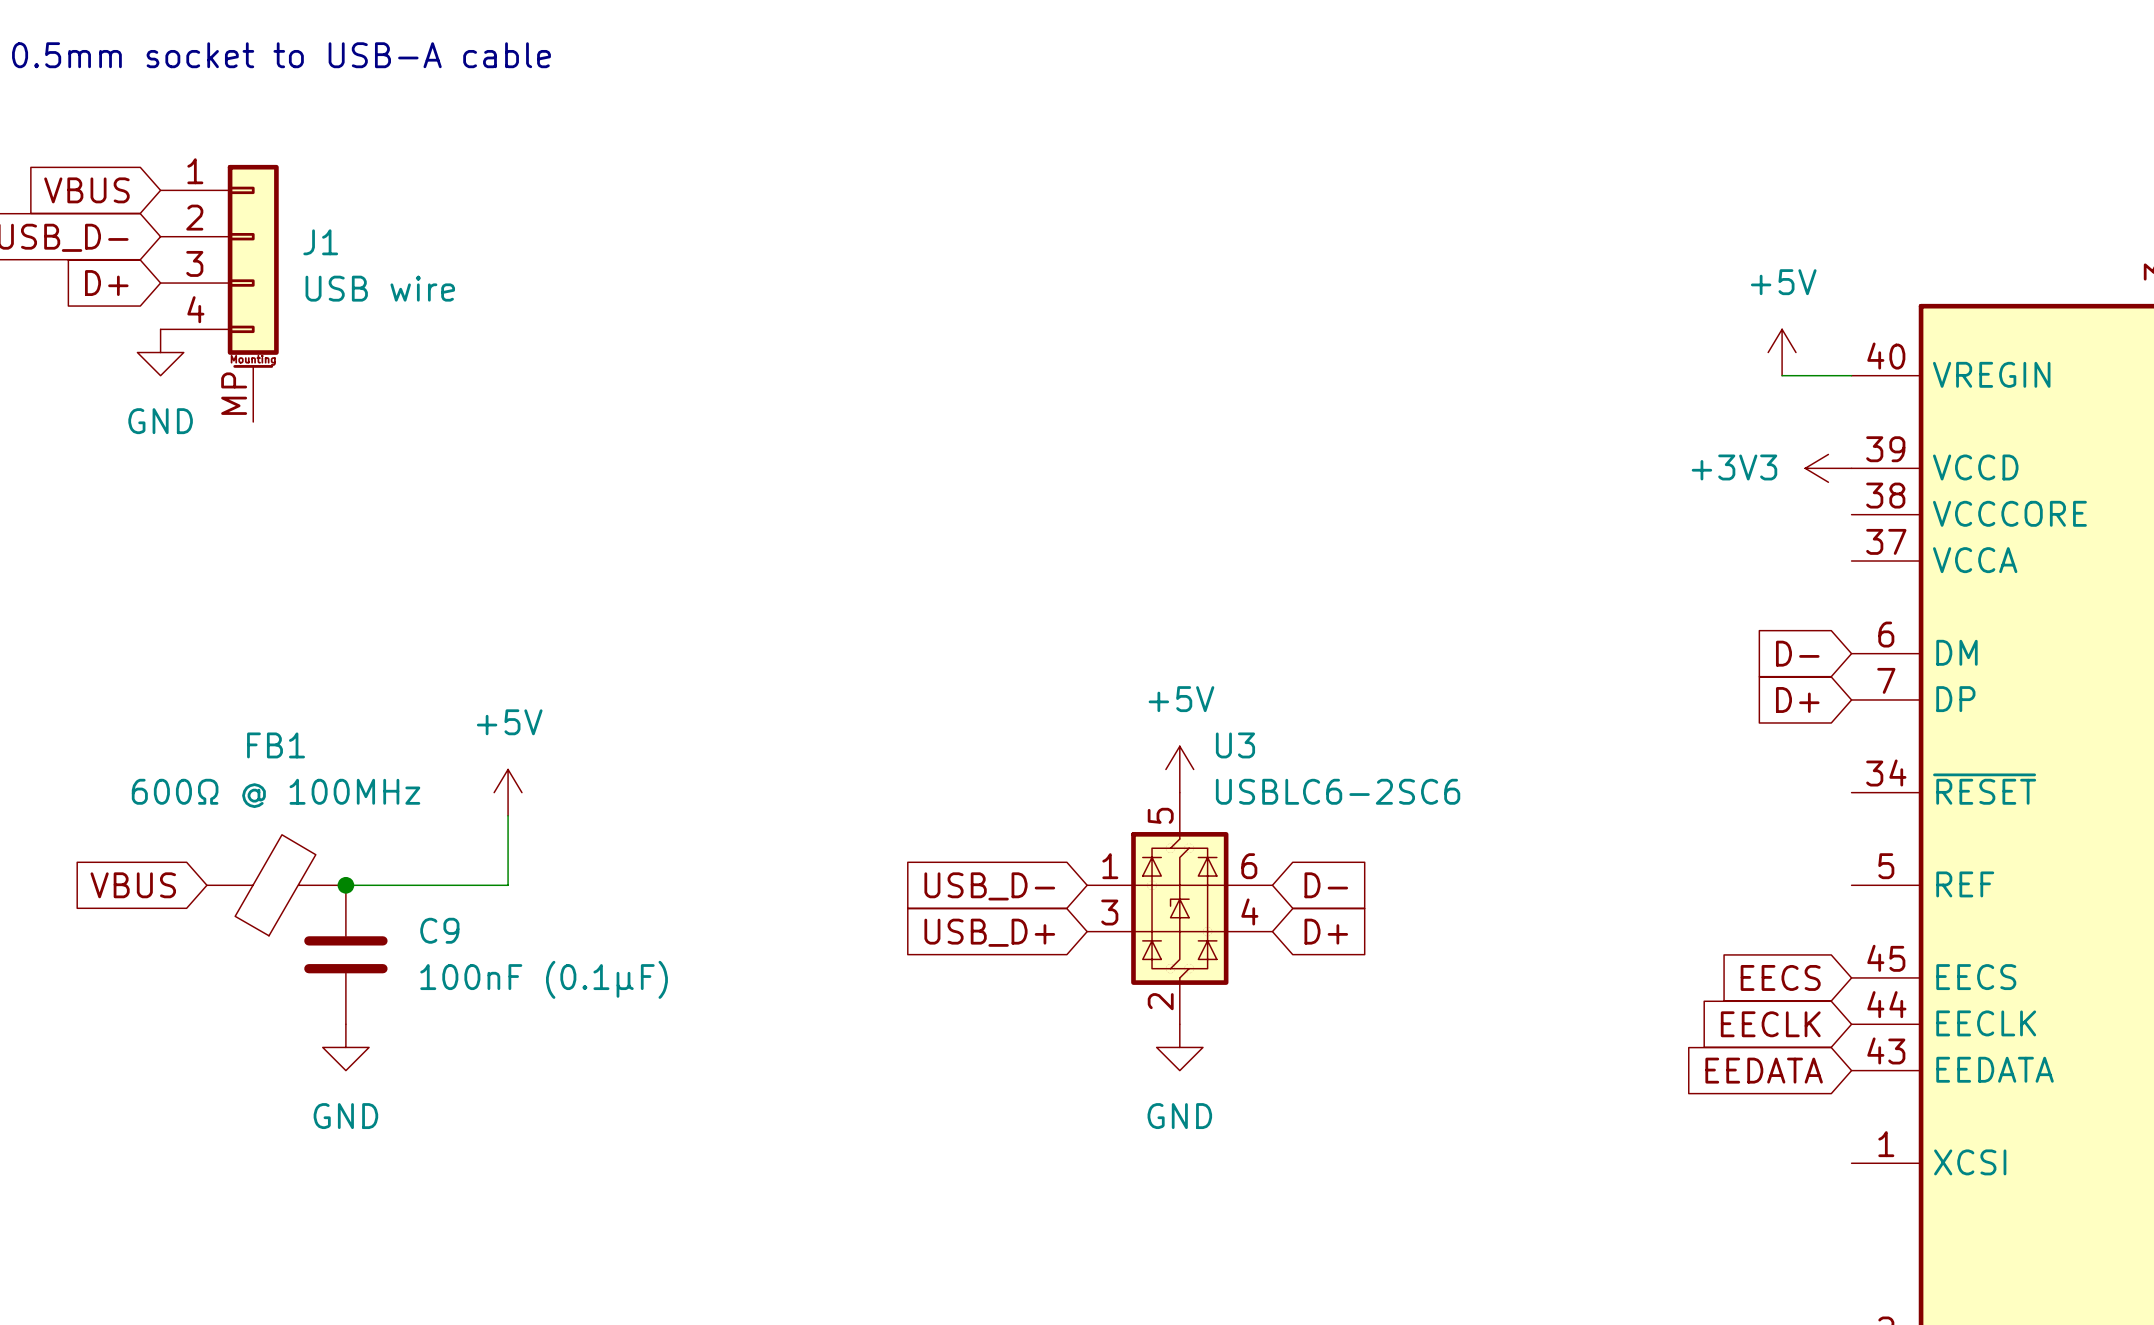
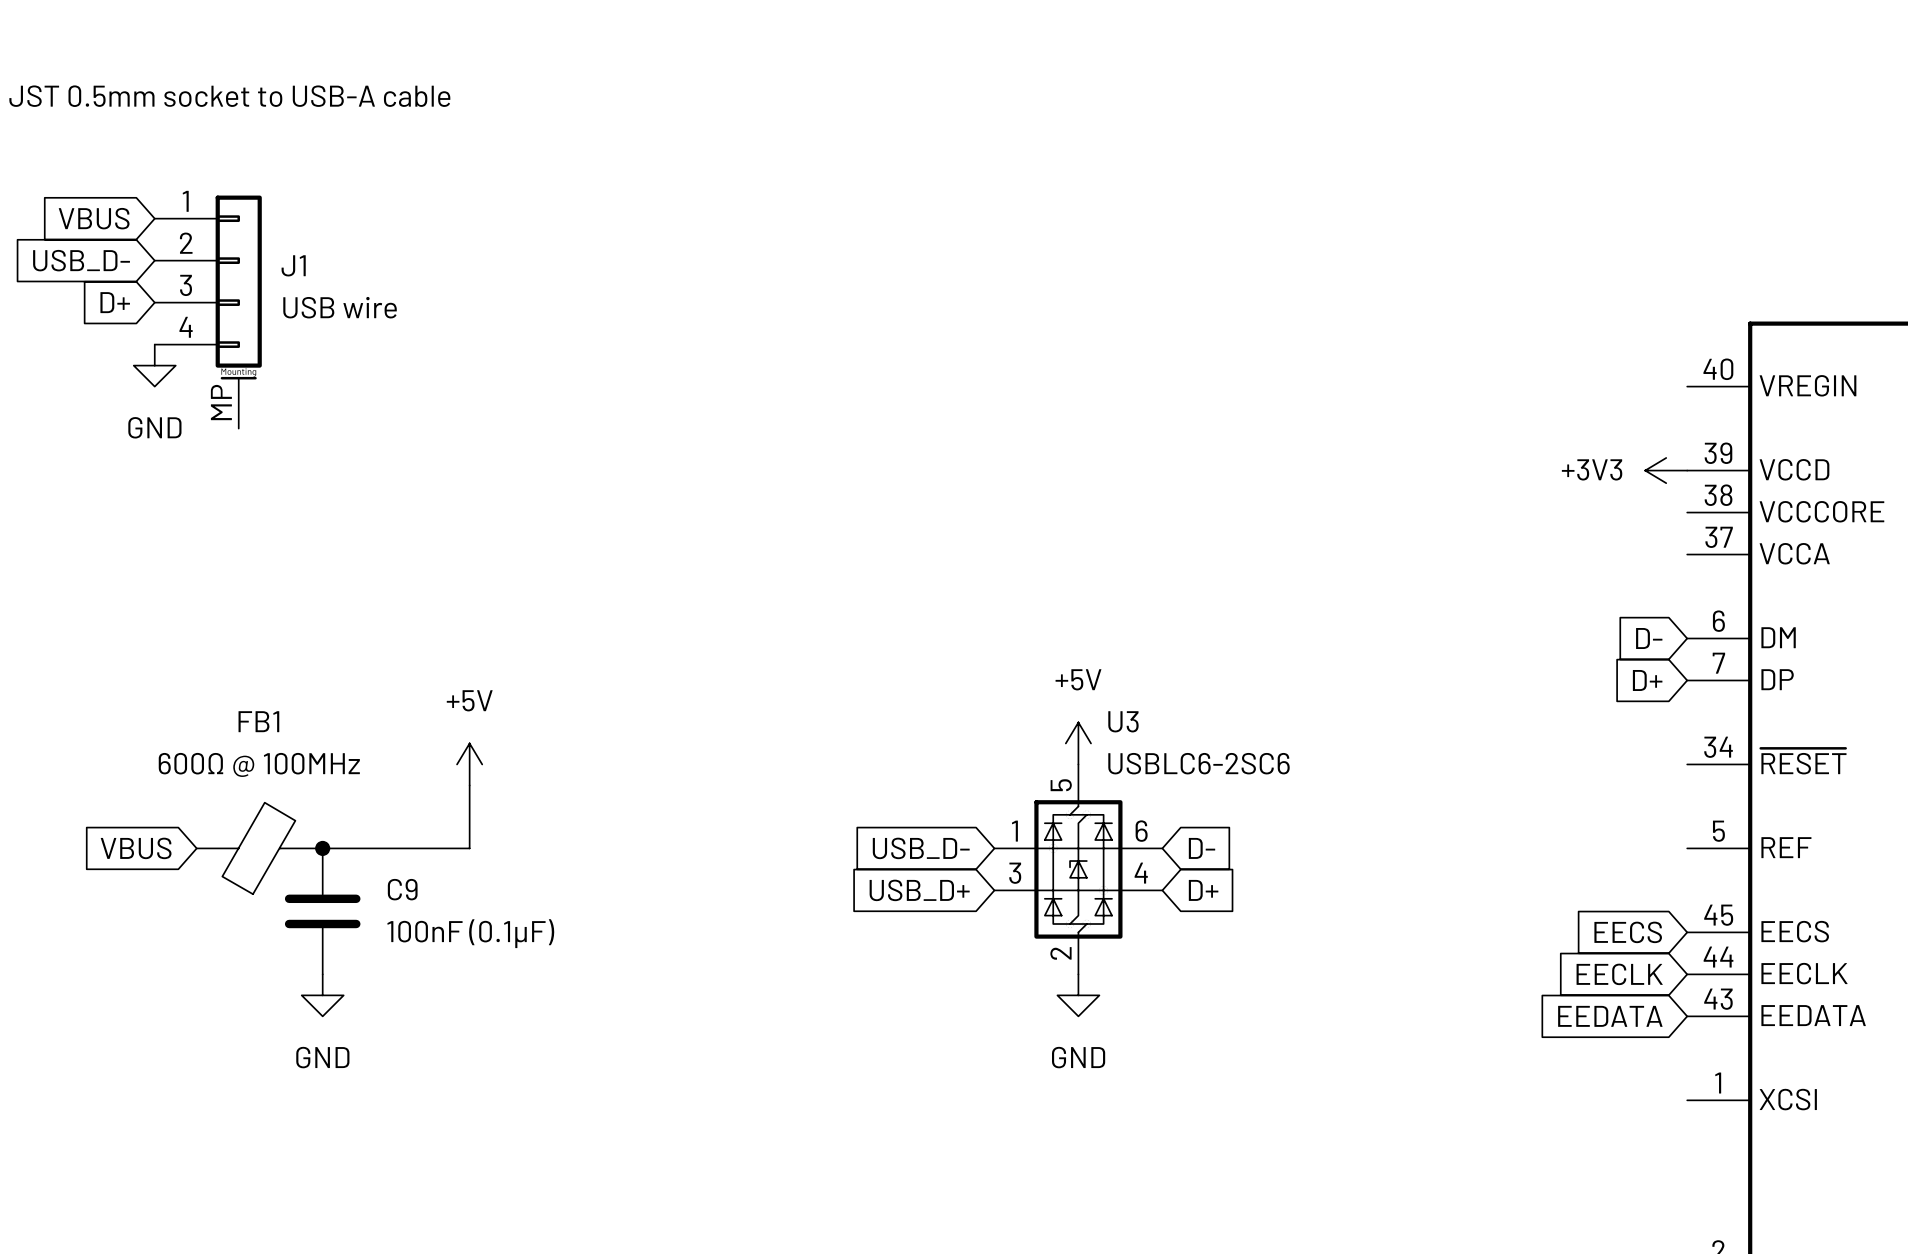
power symbol: +5V (1782, 352) -> none
wire: (1782, 375) (1851, 375) -> none

